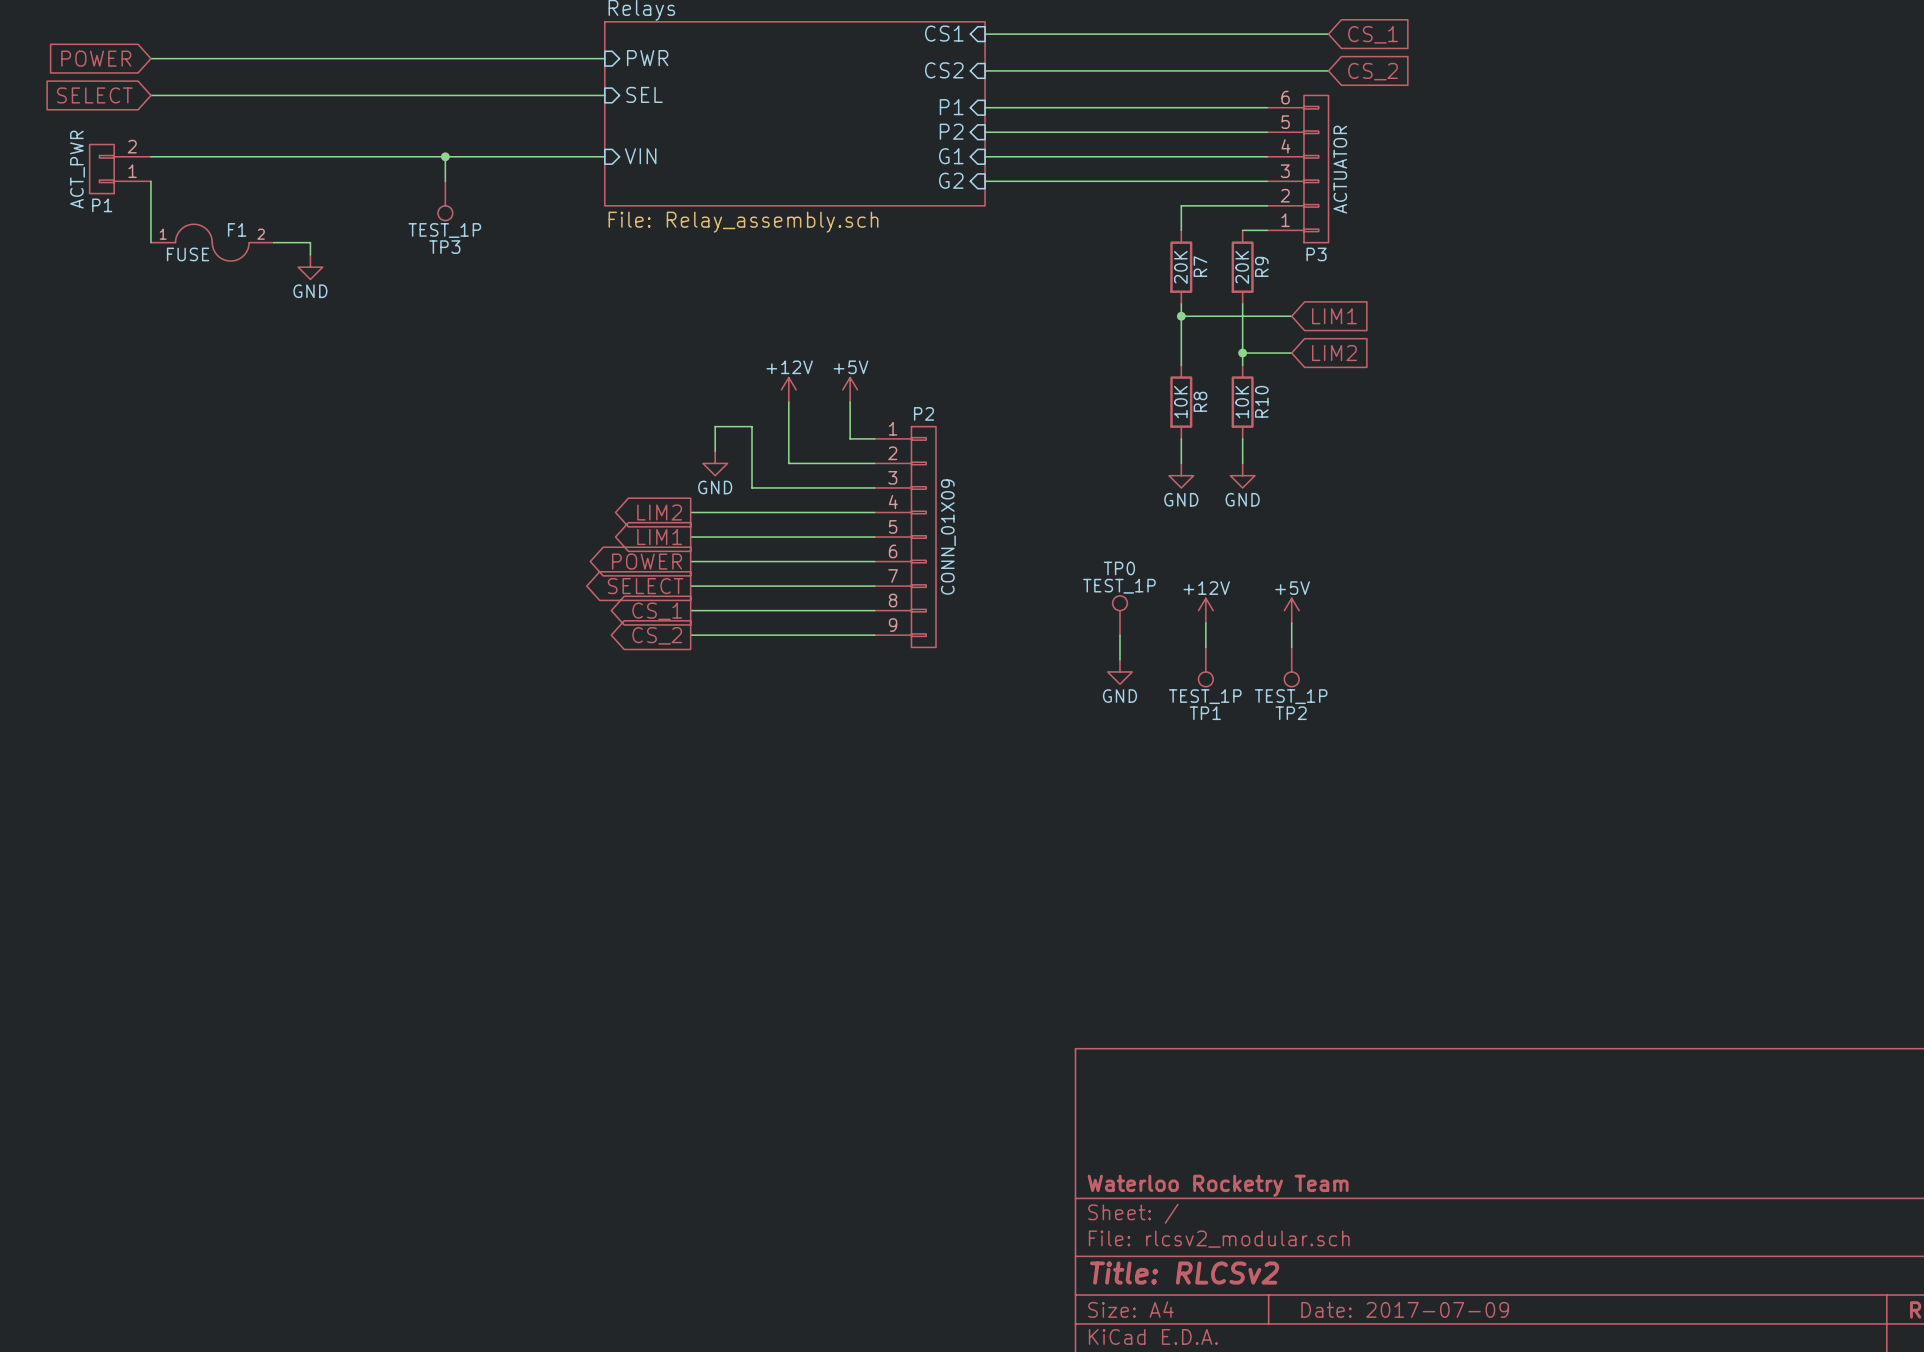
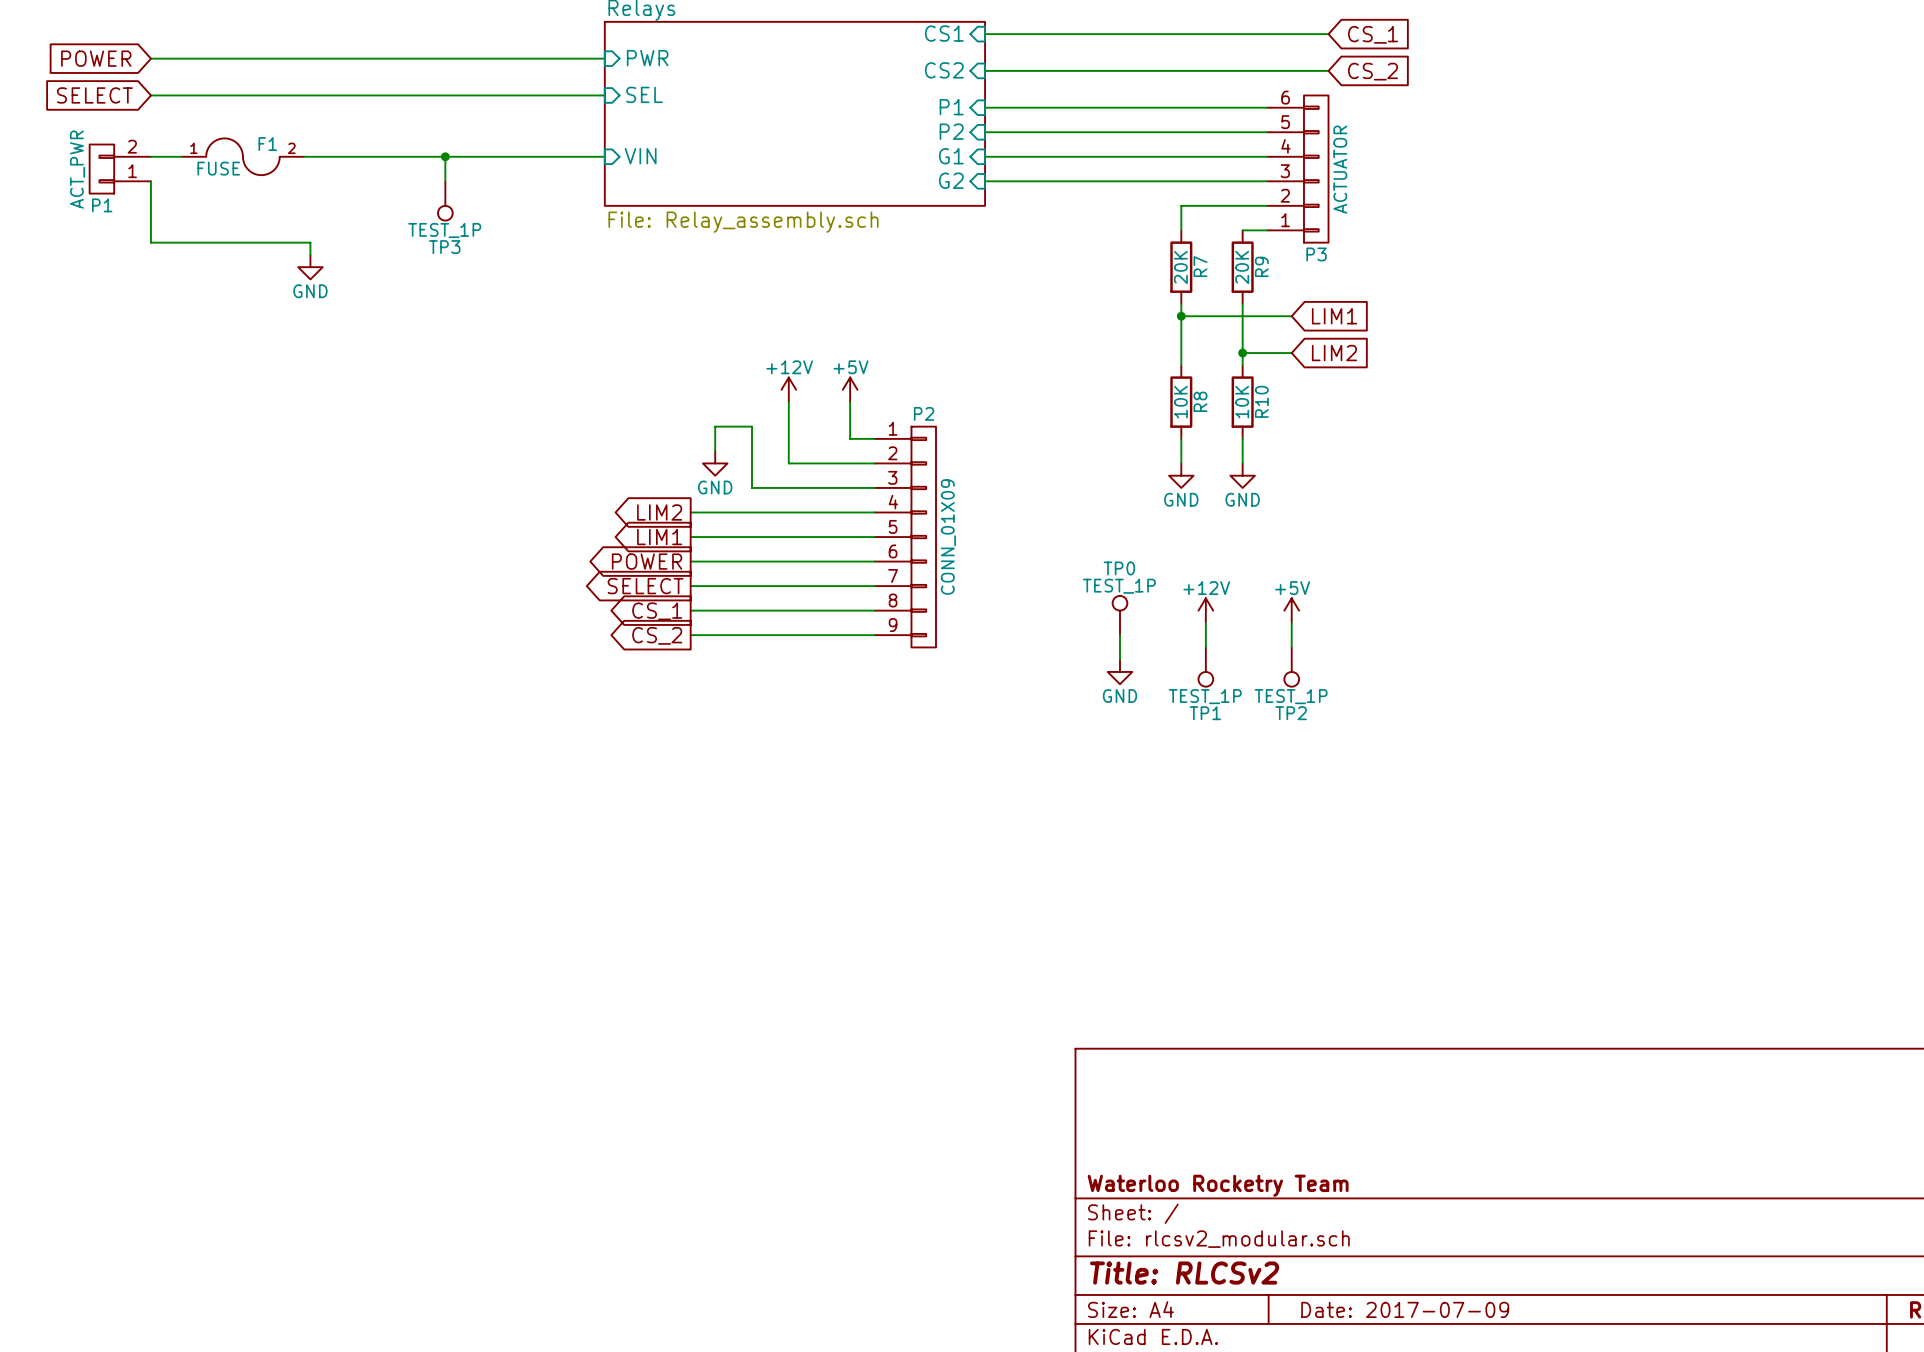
wire: (181, 156) (304, 156) -> (150, 242) (273, 242)
F1 position: (212, 242) -> (242, 156)

